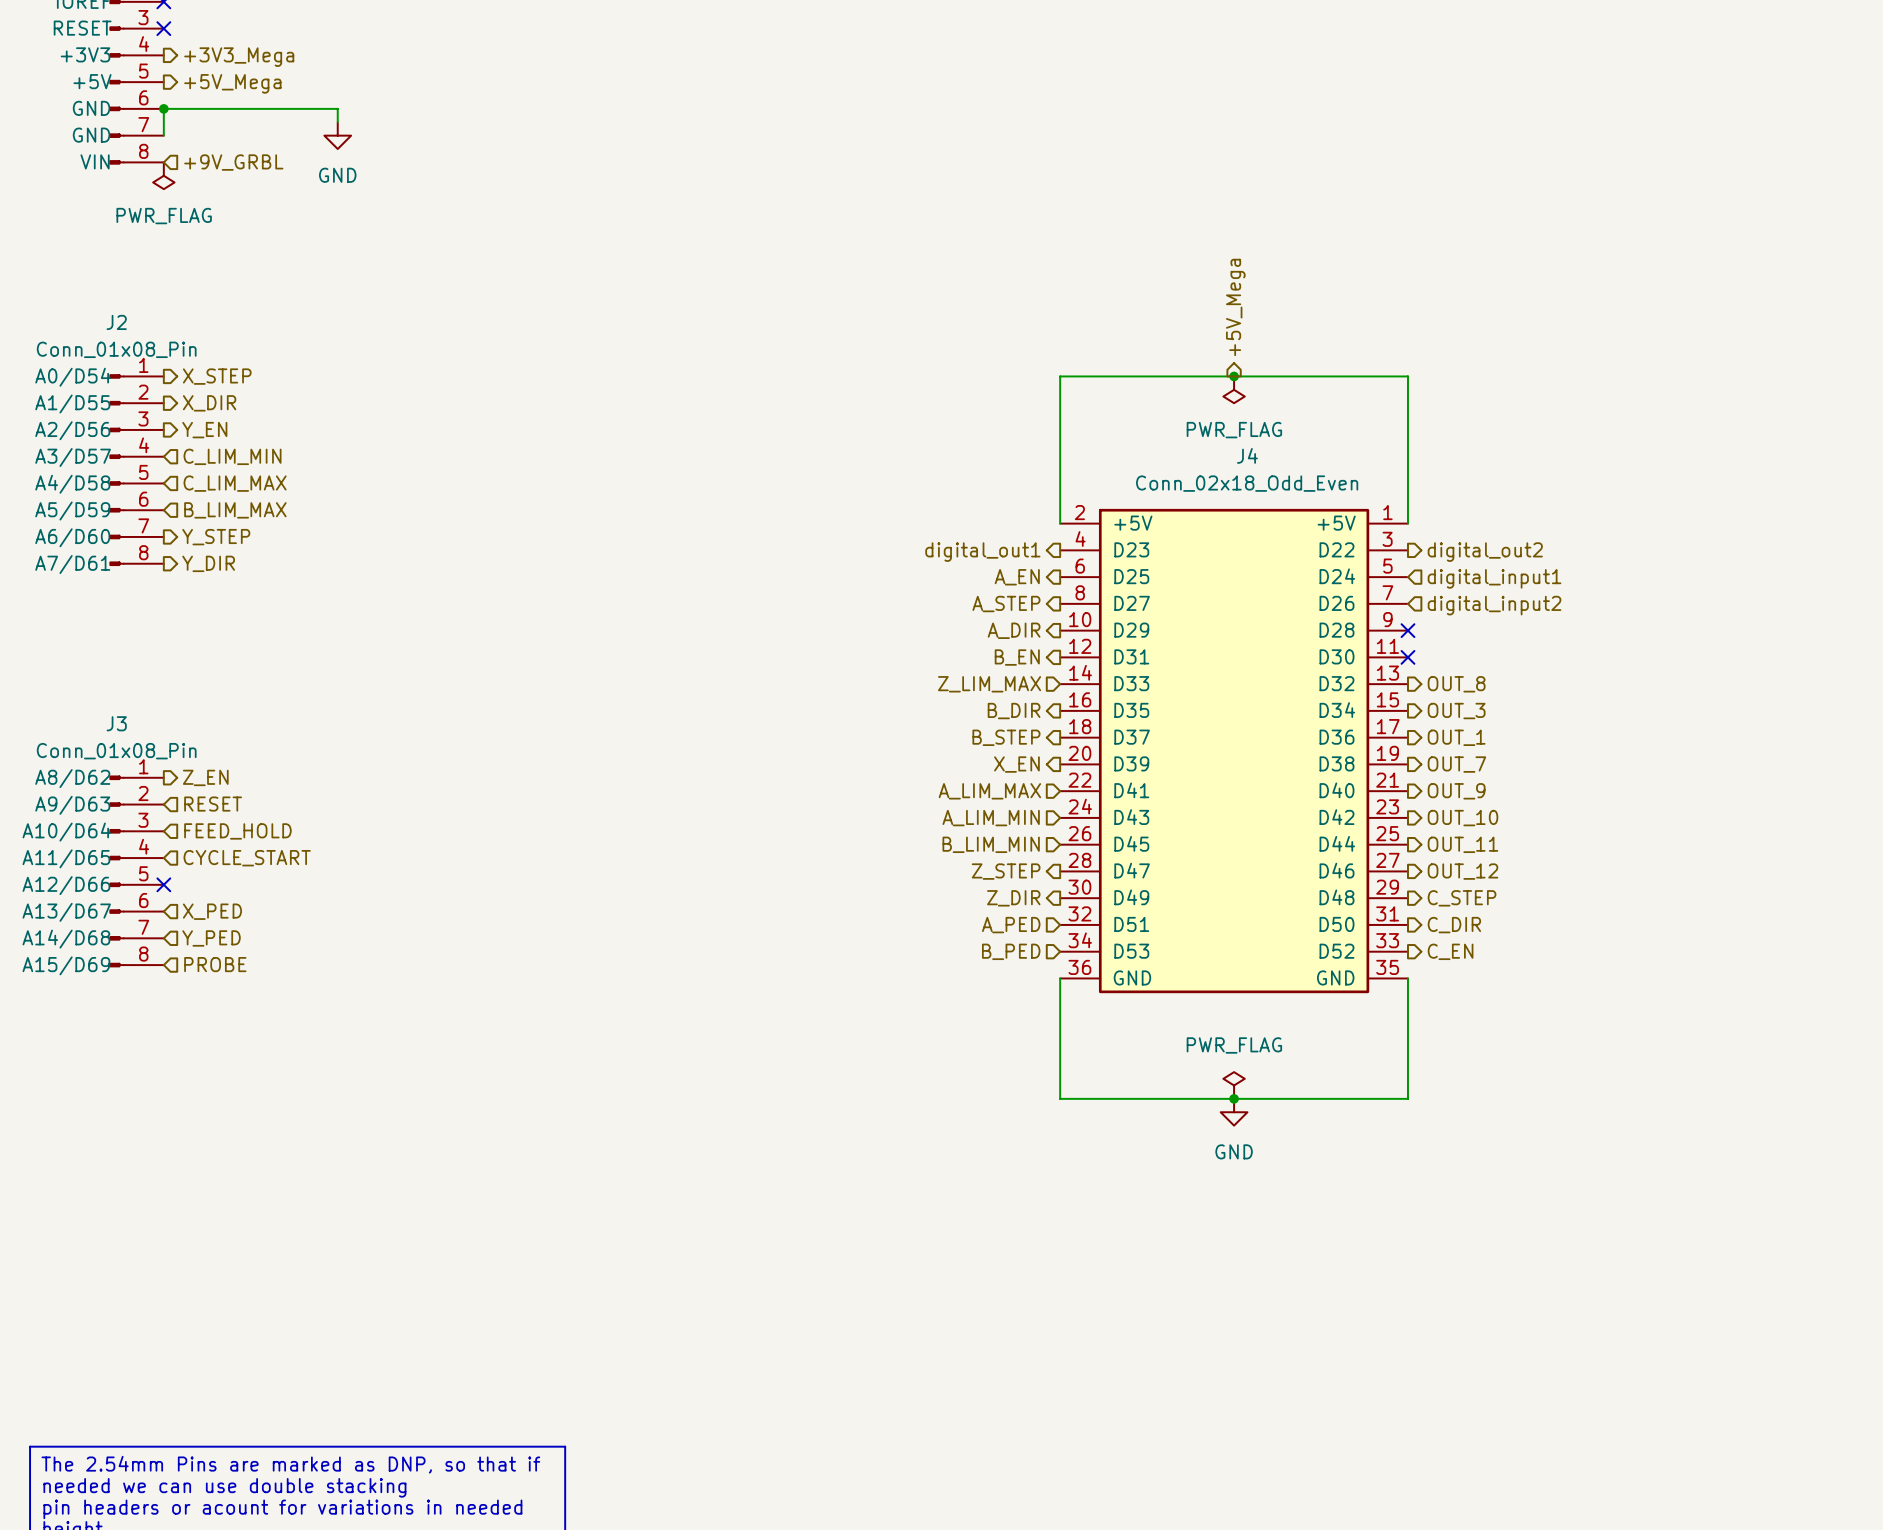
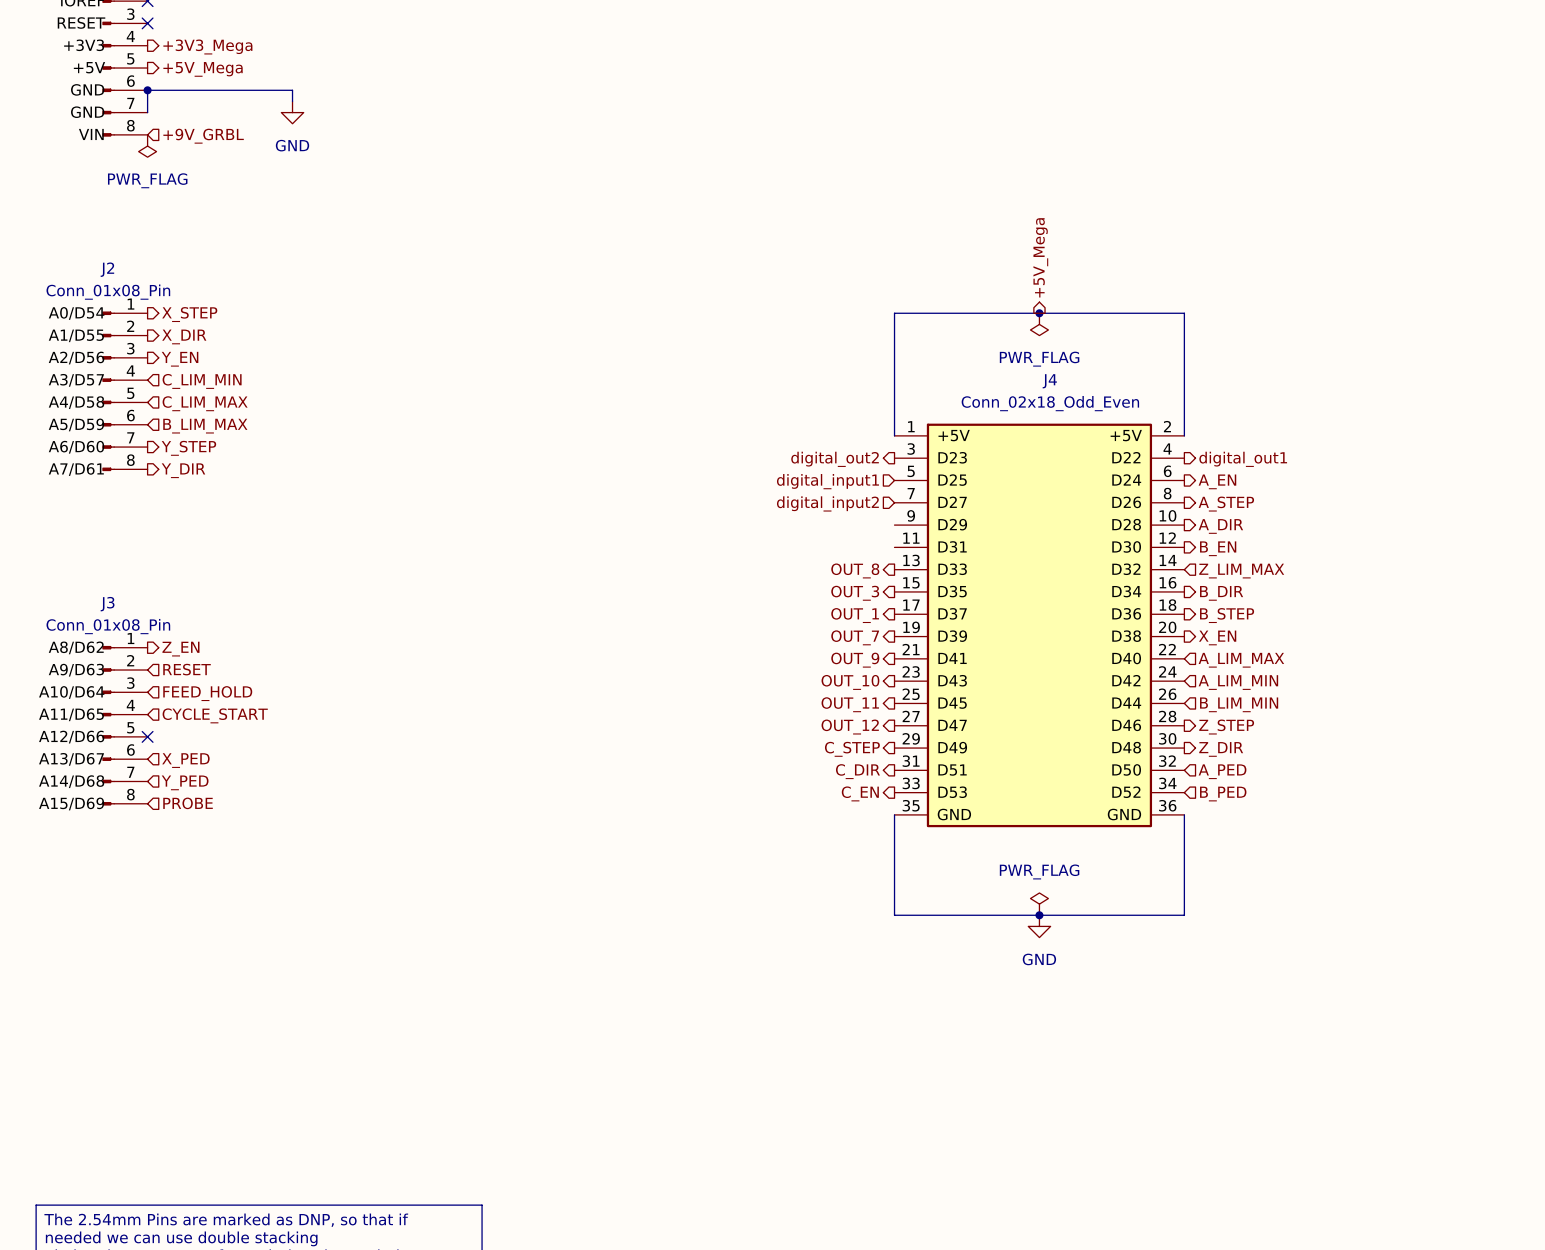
J4 symbol: [1060, 508, 1408, 994] -> [894, 423, 1185, 828]
hierarchical label: digital_out1 (982, 552) -> digital_out2 (835, 459)
hierarchical label: digital_out2 (1485, 552) -> digital_out1 (1243, 459)
hierarchical label shape: output (1017, 577) -> input (827, 481)
hierarchical label: A_EN (1017, 577) -> digital_input1 (827, 481)
hierarchical label shape: input (1494, 578) -> output (1217, 481)
hierarchical label: digital_input1 (1494, 578) -> A_EN (1217, 481)
hierarchical label shape: output (1006, 604) -> input (827, 503)
hierarchical label: A_STEP (1006, 604) -> digital_input2 (827, 503)
hierarchical label shape: input (1494, 605) -> output (1226, 504)
hierarchical label: digital_input2 (1494, 605) -> A_STEP (1226, 504)
hierarchical label: A_DIR (1014, 630) -> none
no-connect mark: (1407, 630) -> none
hierarchical label: none -> A_DIR (1220, 526)
hierarchical label: B_EN (1017, 657) -> none
no-connect mark: (1407, 657) -> none
hierarchical label: none -> B_EN (1218, 548)
hierarchical label shape: input (989, 684) -> output (855, 570)
hierarchical label: Z_LIM_MAX (989, 684) -> OUT_8 (855, 570)
hierarchical label shape: output (1456, 684) -> input (1241, 571)
hierarchical label: OUT_8 (1456, 684) -> Z_LIM_MAX (1241, 571)
hierarchical label: B_DIR (1014, 711) -> OUT_3 (855, 593)
hierarchical label: OUT_3 (1456, 711) -> B_DIR (1221, 593)
hierarchical label: B_STEP (1006, 737) -> OUT_1 (855, 615)
hierarchical label: OUT_1 (1456, 737) -> B_STEP (1227, 615)
hierarchical label: X_EN (1016, 764) -> OUT_7 (855, 637)
hierarchical label: OUT_7 (1456, 764) -> X_EN (1217, 637)
hierarchical label shape: input (989, 791) -> output (855, 660)
hierarchical label: A_LIM_MAX (989, 791) -> OUT_9 (855, 660)
hierarchical label shape: output (1456, 791) -> input (1241, 660)
hierarchical label: OUT_9 (1456, 791) -> A_LIM_MAX (1241, 660)
hierarchical label shape: input (991, 818) -> output (850, 682)
hierarchical label: A_LIM_MIN (991, 818) -> OUT_10 (850, 682)
hierarchical label shape: output (1462, 818) -> input (1238, 682)
hierarchical label: OUT_10 (1462, 818) -> A_LIM_MIN (1238, 682)
hierarchical label shape: input (991, 844) -> output (850, 704)
hierarchical label: B_LIM_MIN (991, 844) -> OUT_11 (850, 704)
hierarchical label shape: output (1462, 844) -> input (1239, 704)
hierarchical label: OUT_11 (1462, 844) -> B_LIM_MIN (1239, 704)
hierarchical label: Z_STEP (1006, 871) -> OUT_12 (850, 727)
hierarchical label: OUT_12 (1462, 871) -> Z_STEP (1226, 727)
hierarchical label: Z_DIR (1013, 898) -> C_STEP (852, 749)
hierarchical label: C_STEP (1462, 898) -> Z_DIR (1221, 749)
hierarchical label shape: input (1011, 925) -> output (857, 771)
hierarchical label: A_PED (1011, 925) -> C_DIR (857, 771)
hierarchical label shape: output (1454, 925) -> input (1222, 771)
hierarchical label: C_DIR (1454, 925) -> A_PED (1222, 771)
hierarchical label shape: input (1011, 951) -> output (860, 793)
hierarchical label: B_PED (1011, 951) -> C_EN (860, 793)
hierarchical label shape: output (1450, 951) -> input (1223, 794)
hierarchical label: C_EN (1450, 951) -> B_PED (1223, 794)

